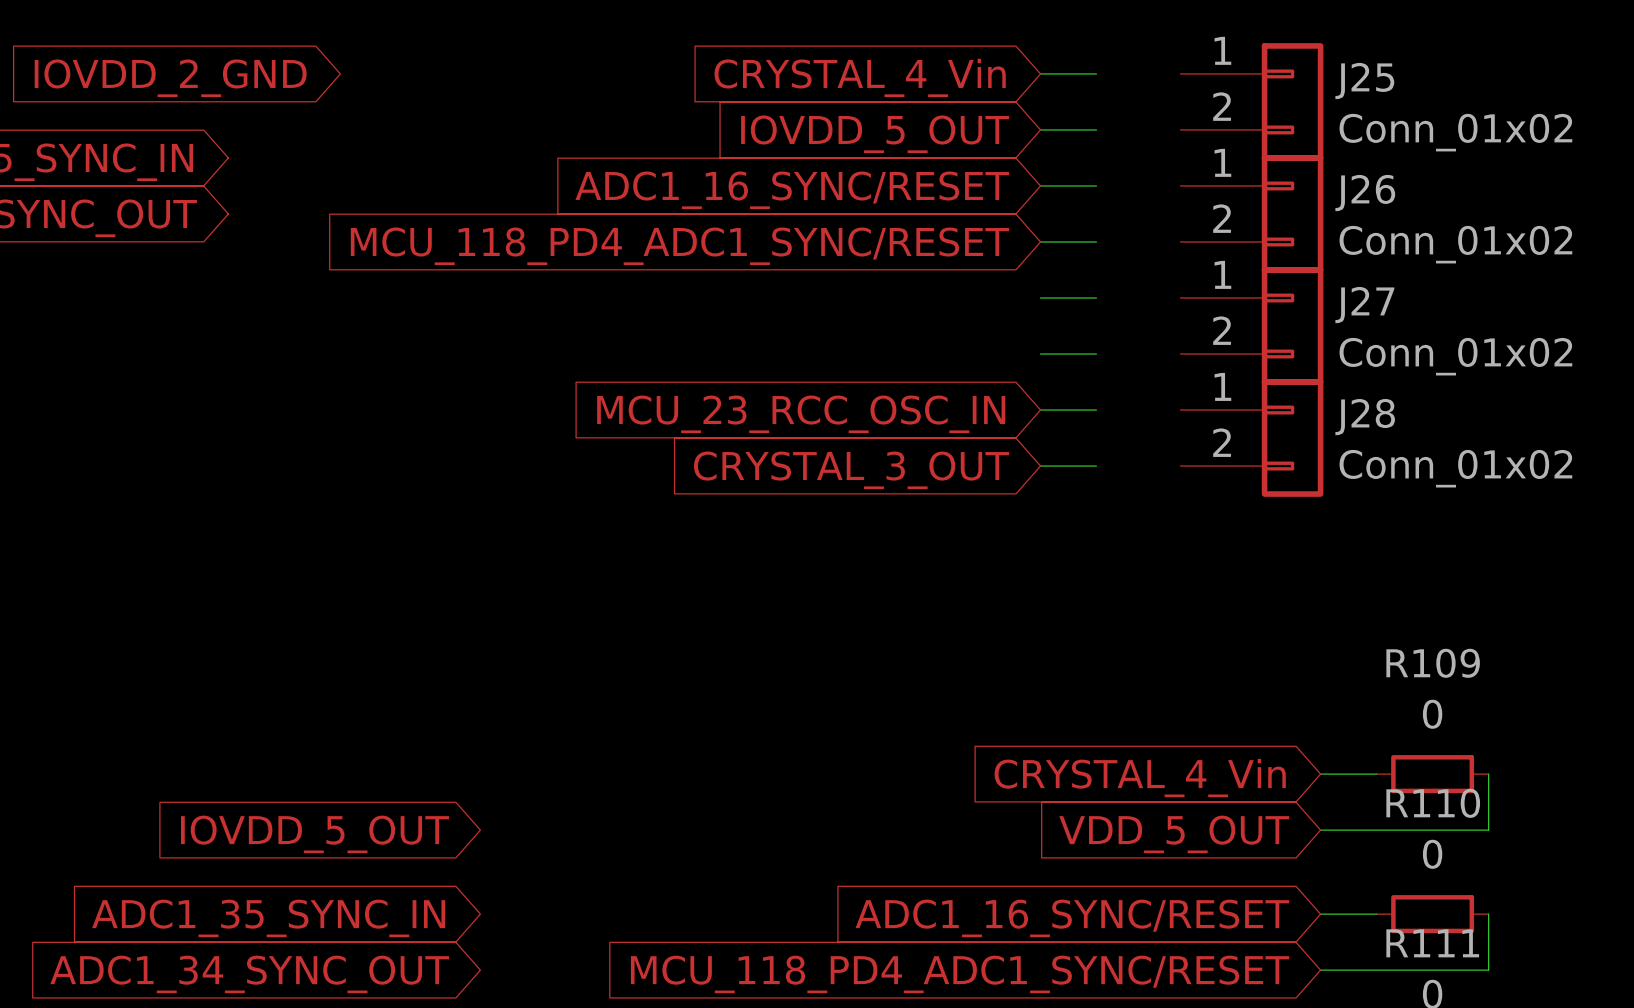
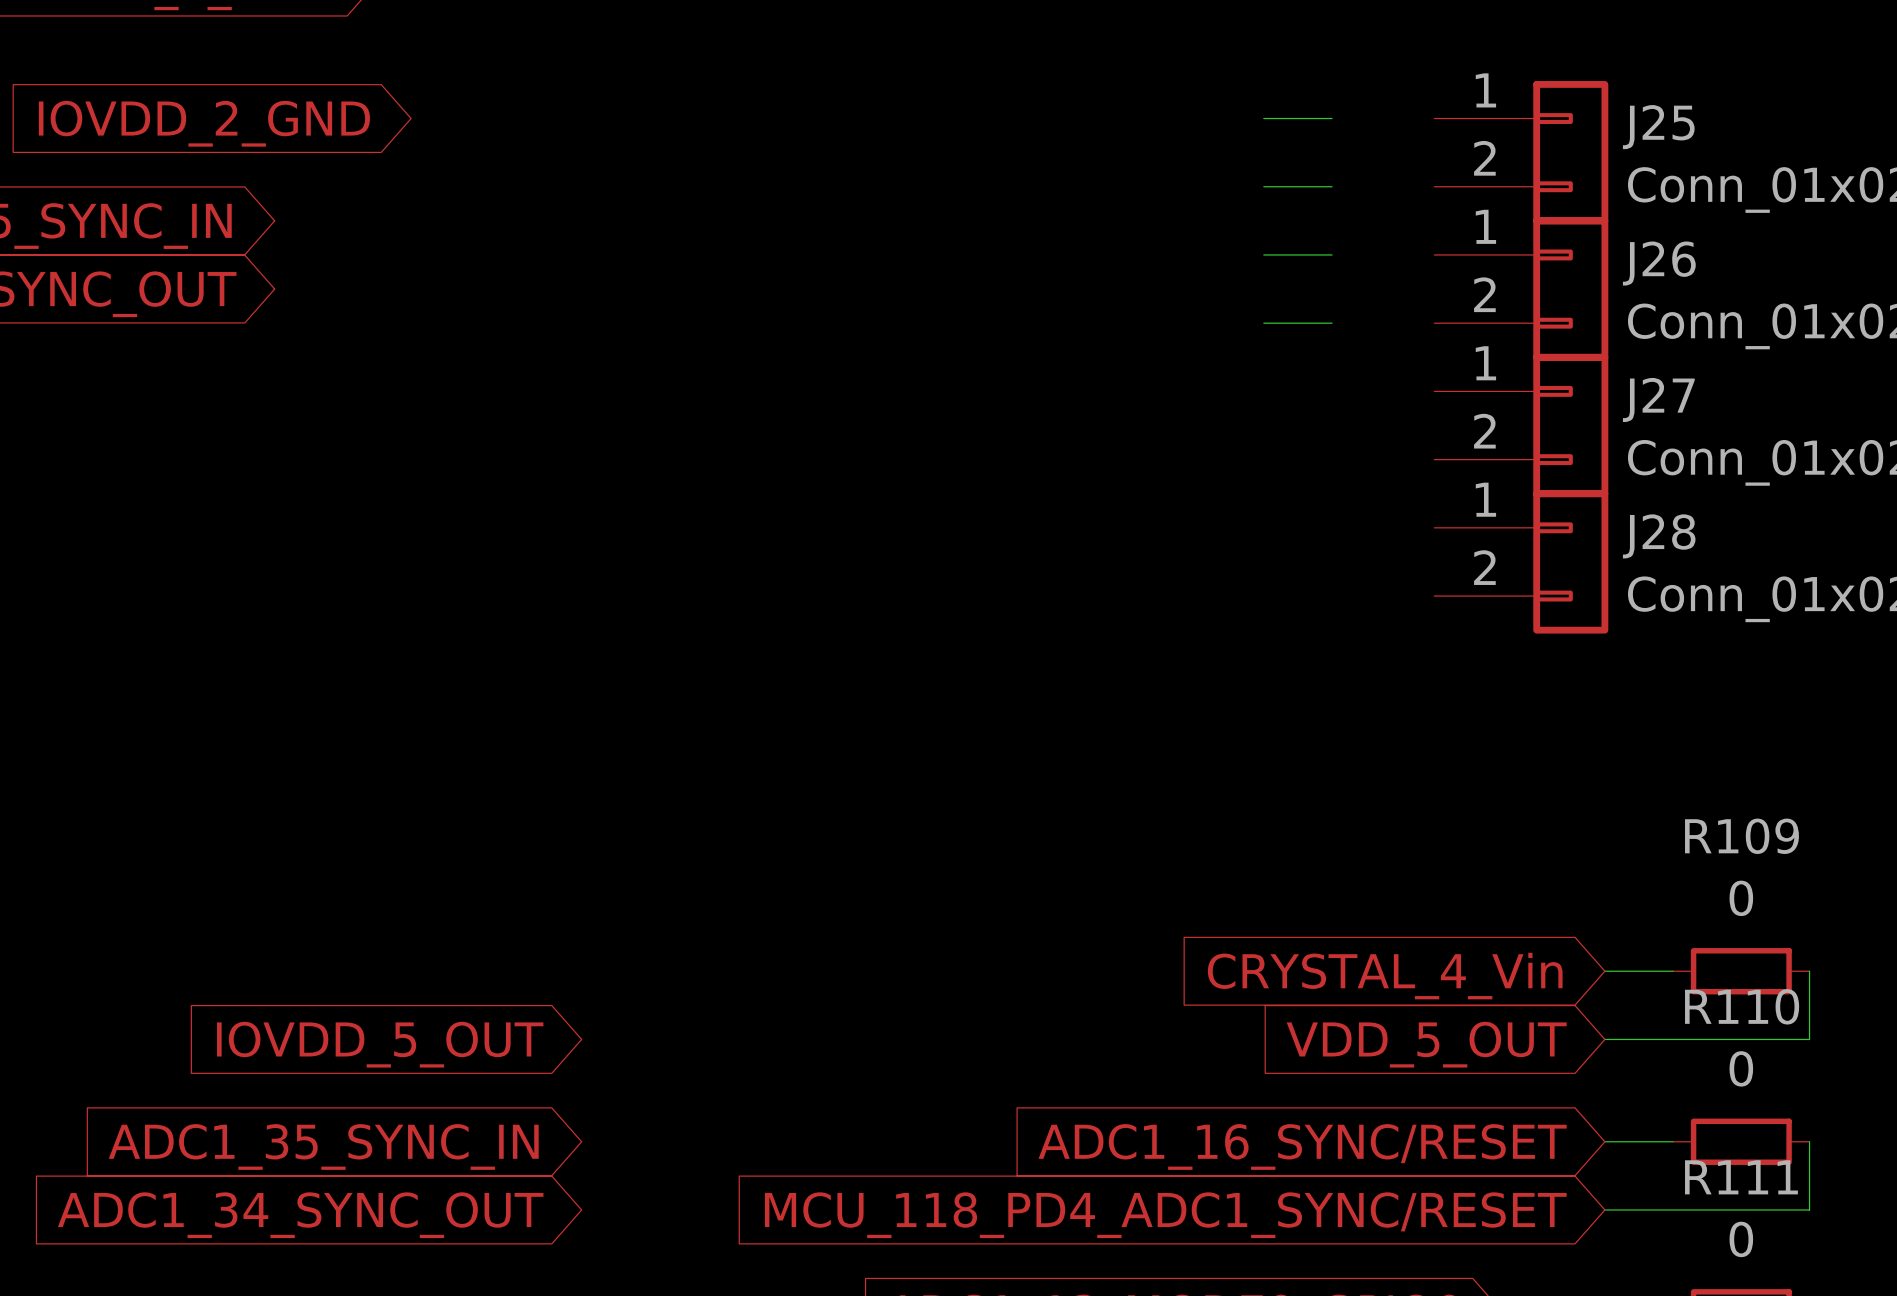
global label: CRYSTAL_4_Vin (860, 77) -> none
global label: IOVDD_5_OUT (875, 134) -> none
global label: ADC1_16_SYNC/RESET (792, 190) -> none
global label: MCU_118_PD4_ADC1_SYNC/RESET (679, 246) -> none
wire: (1040, 298) (1096, 298) -> none
wire: (1040, 354) (1096, 354) -> none
wire: (1040, 410) (1096, 410) -> none
global label: MCU_23_RCC_OSC_IN (801, 414) -> none
wire: (1040, 466) (1096, 466) -> none
global label: CRYSTAL_3_OUT (851, 470) -> none

